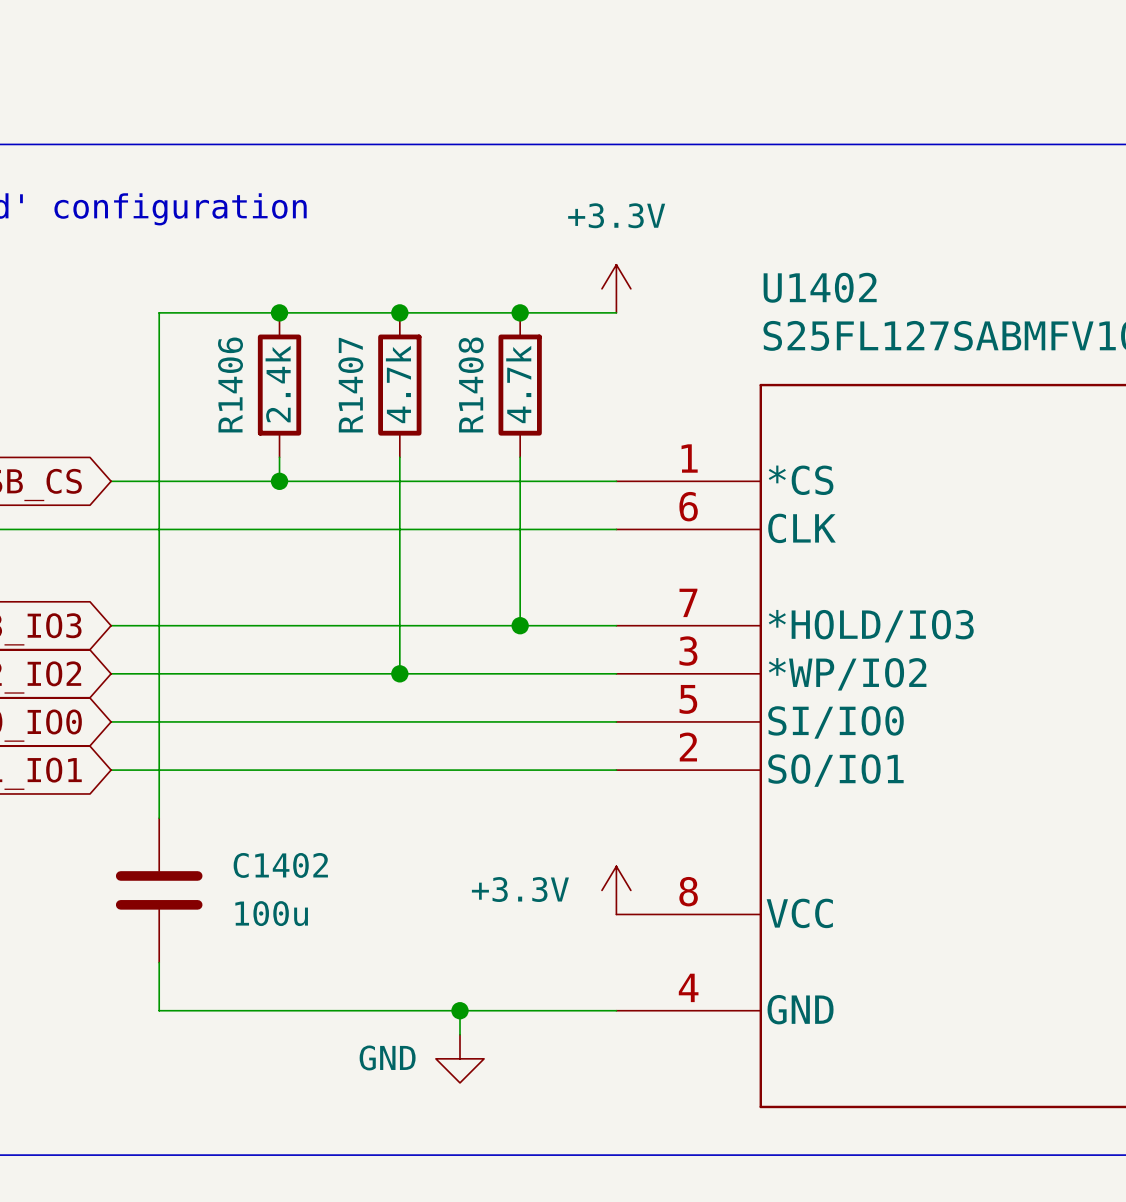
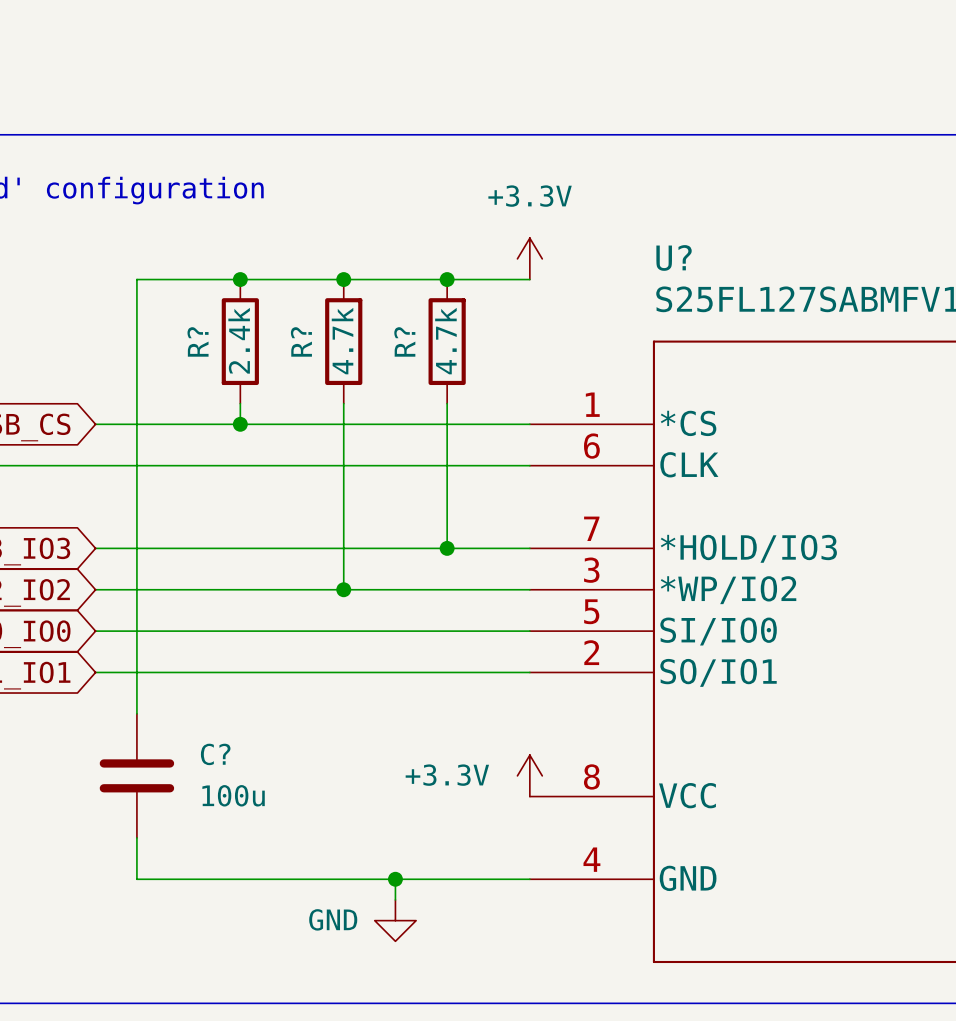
U1402 name: U1402 (820, 287) -> U? (674, 257)
R1406 name: R1406 (230, 384) -> R? (198, 341)
R1408 name: R1408 (471, 384) -> R? (404, 341)
R1407 name: R1407 (350, 385) -> R? (301, 341)
C1402 name: C1402 (280, 865) -> C? (215, 754)

